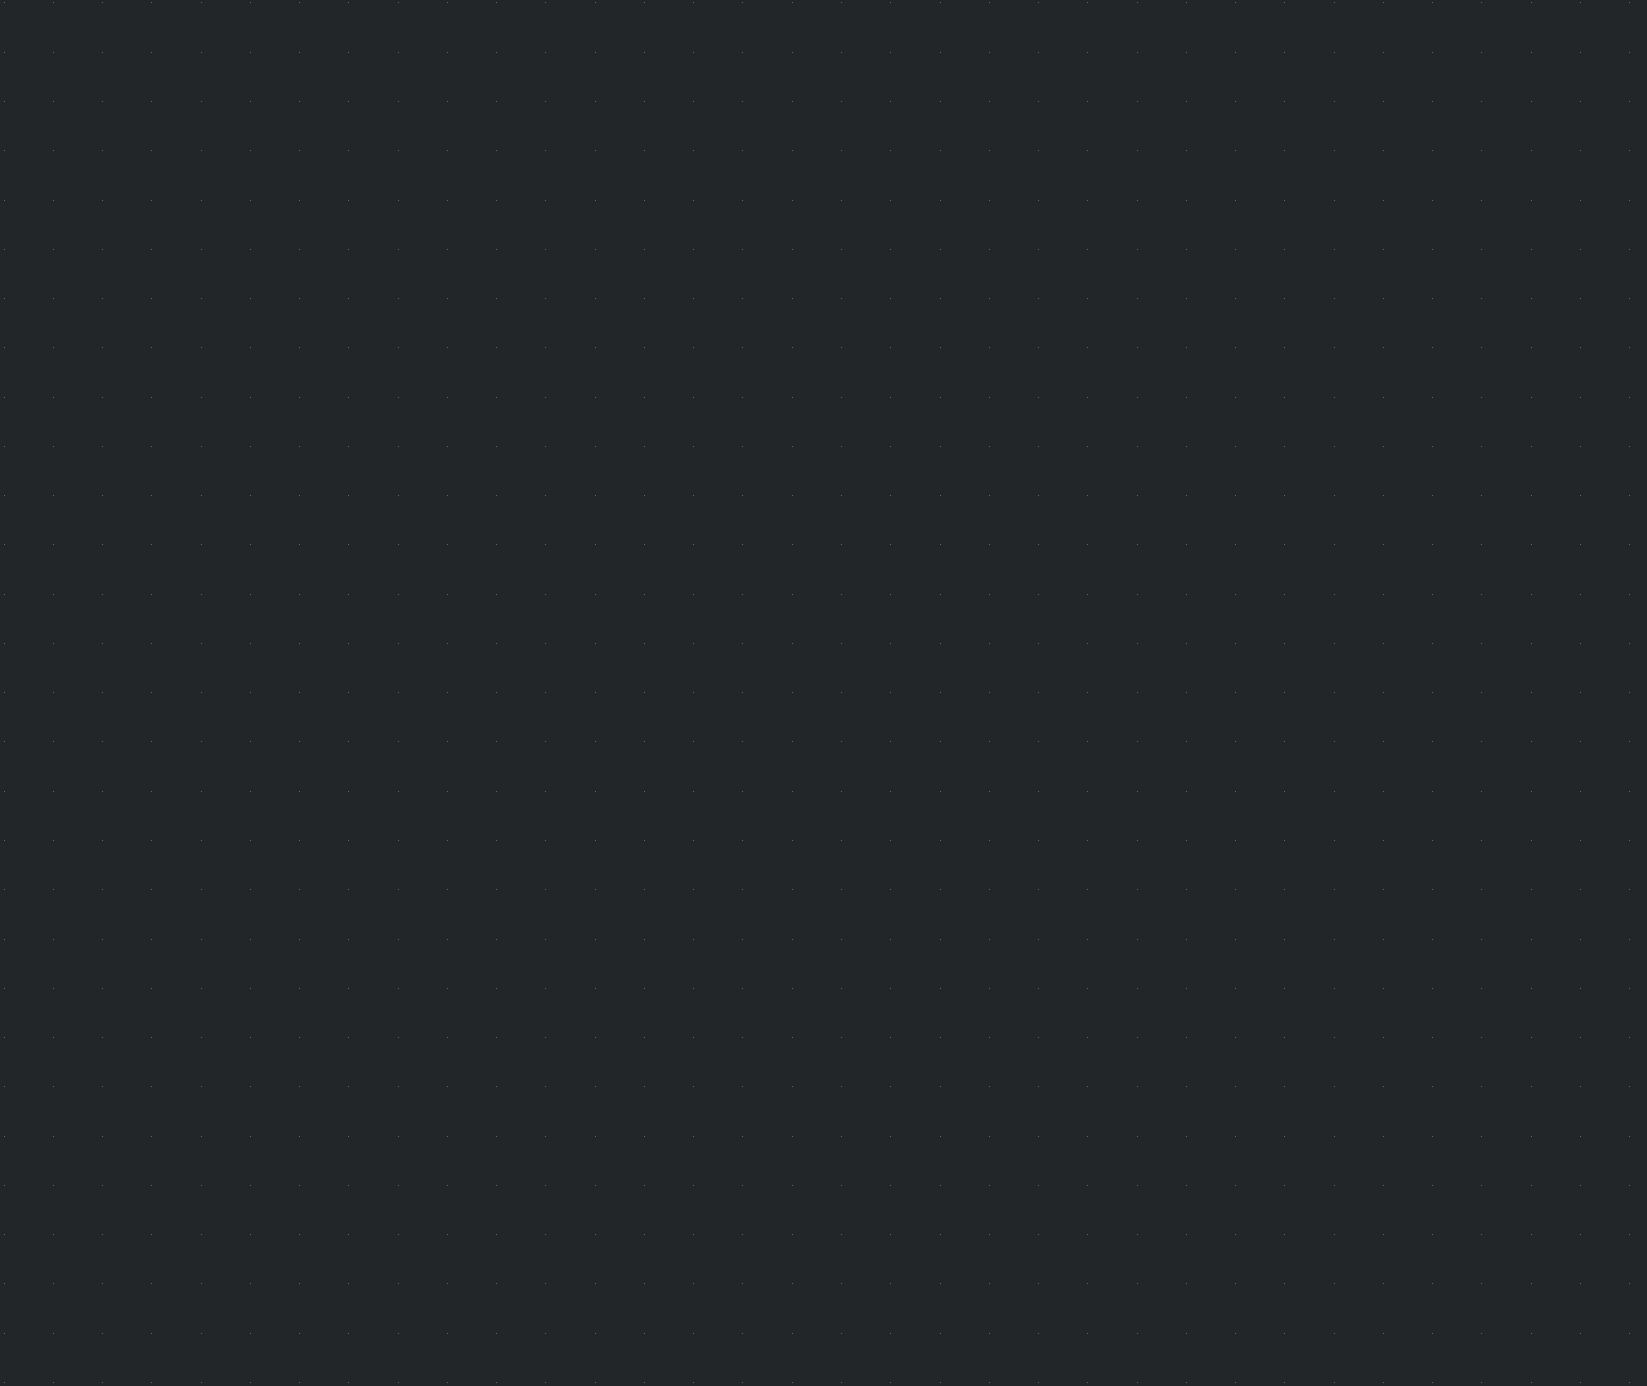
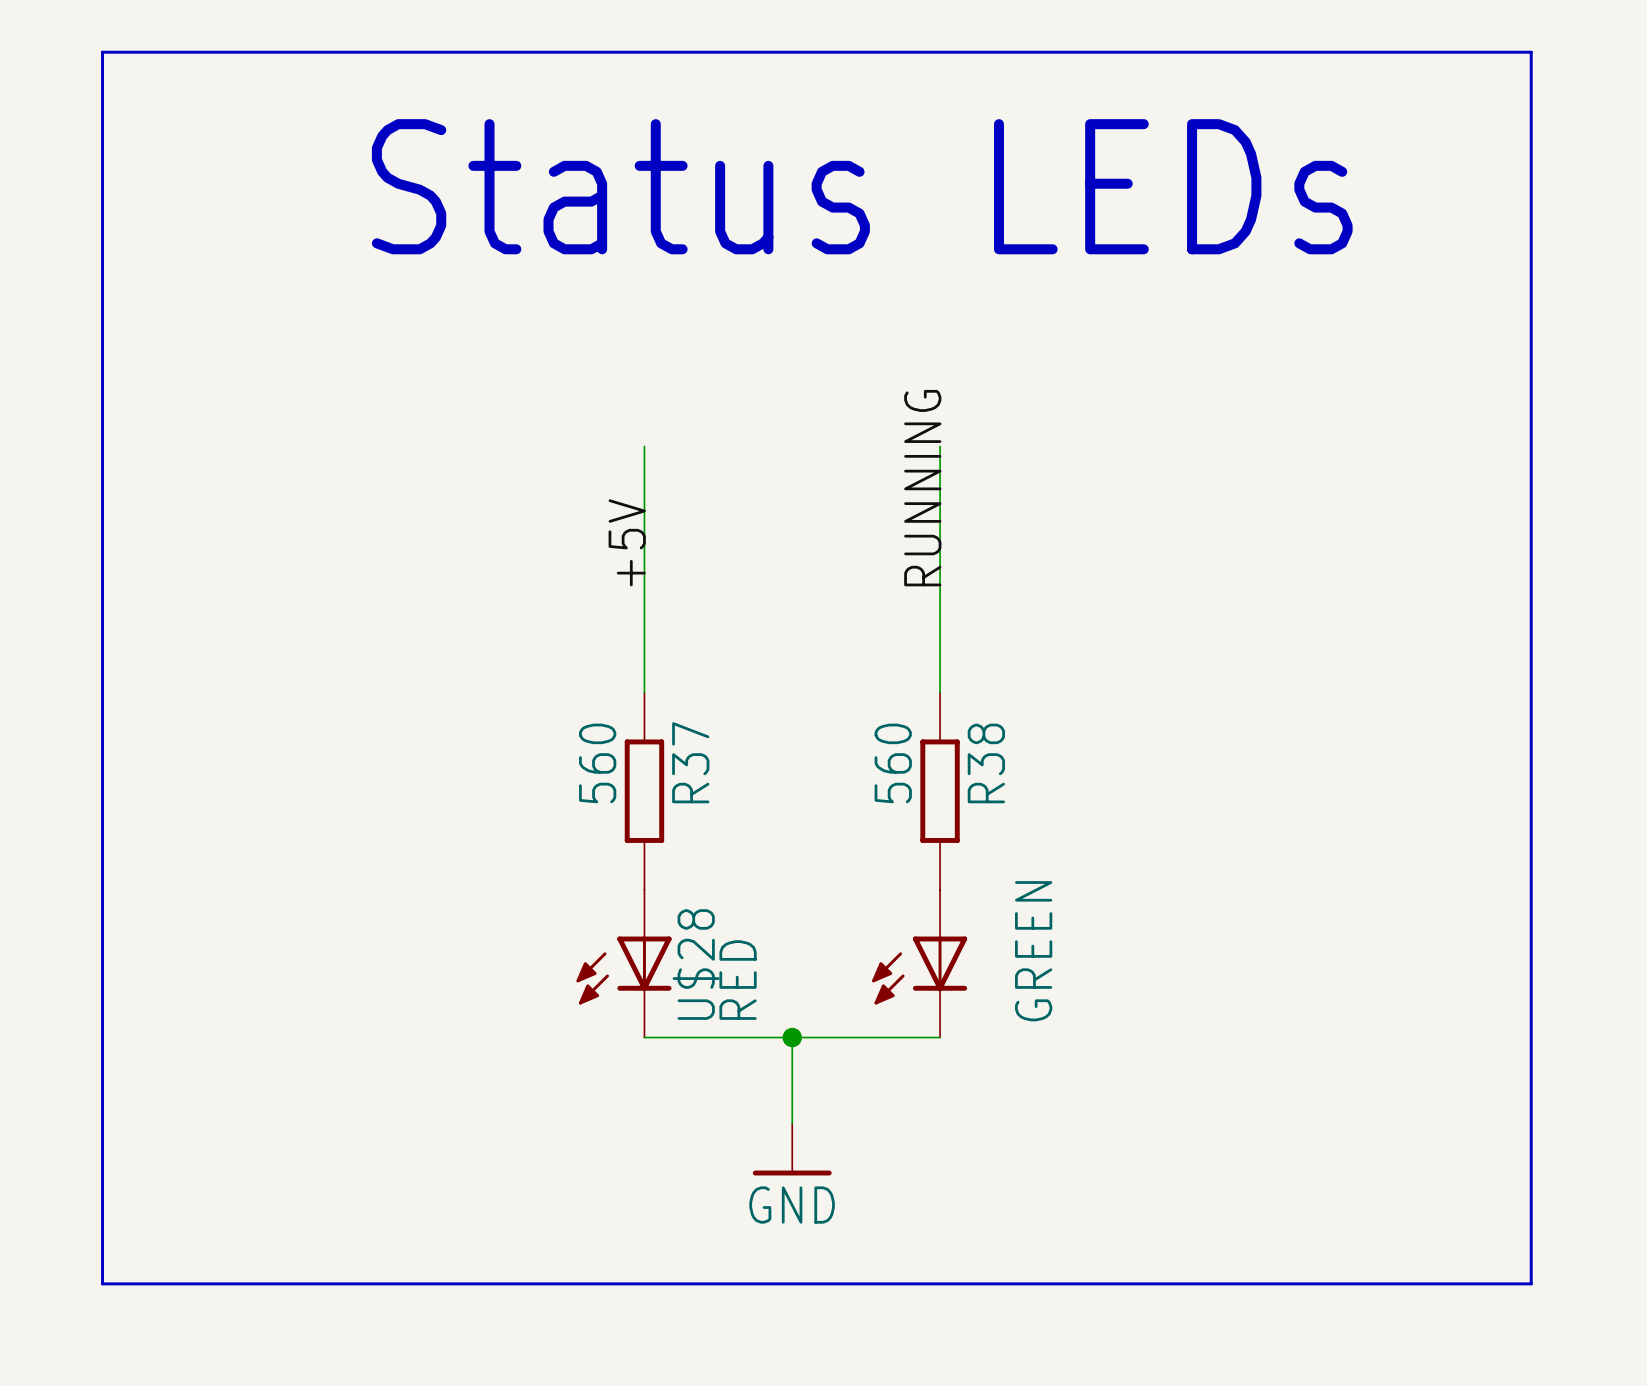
line: none -> (102, 52) (102, 1283) (1531, 1283) (1531, 52) (102, 52)
text: none -> Status LEDs (862, 186)
wire: none -> (644, 446) (644, 692)
wire: none -> (940, 446) (940, 692)
label: none -> RUNNING (922, 488)
label: none -> +5V (627, 542)
R37: none -> 560 (644, 791)
R38: none -> 560 (940, 791)
U$28: none -> (771, 963)
wire: none -> (644, 1037) (940, 1037)
wire: none -> (792, 1037) (792, 1123)
junction: none -> (792, 1037)
power symbol: none -> GND (792, 1149)

